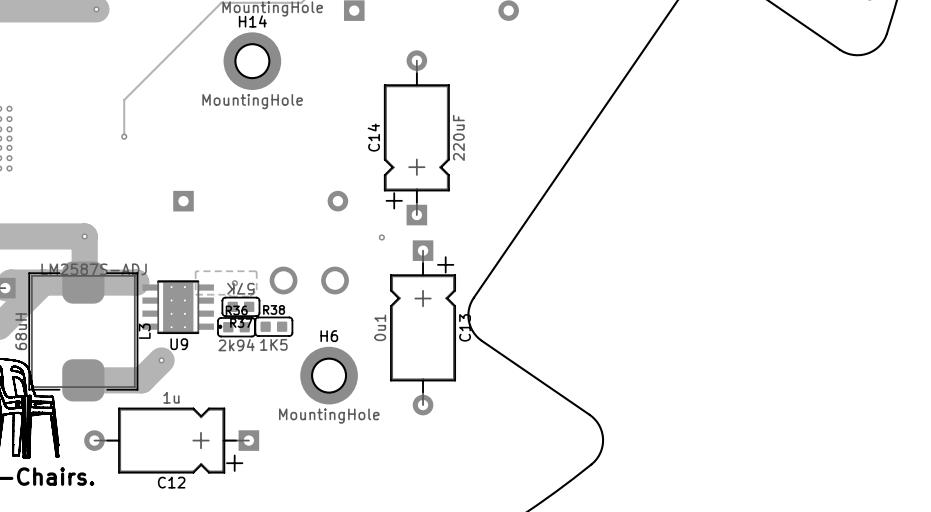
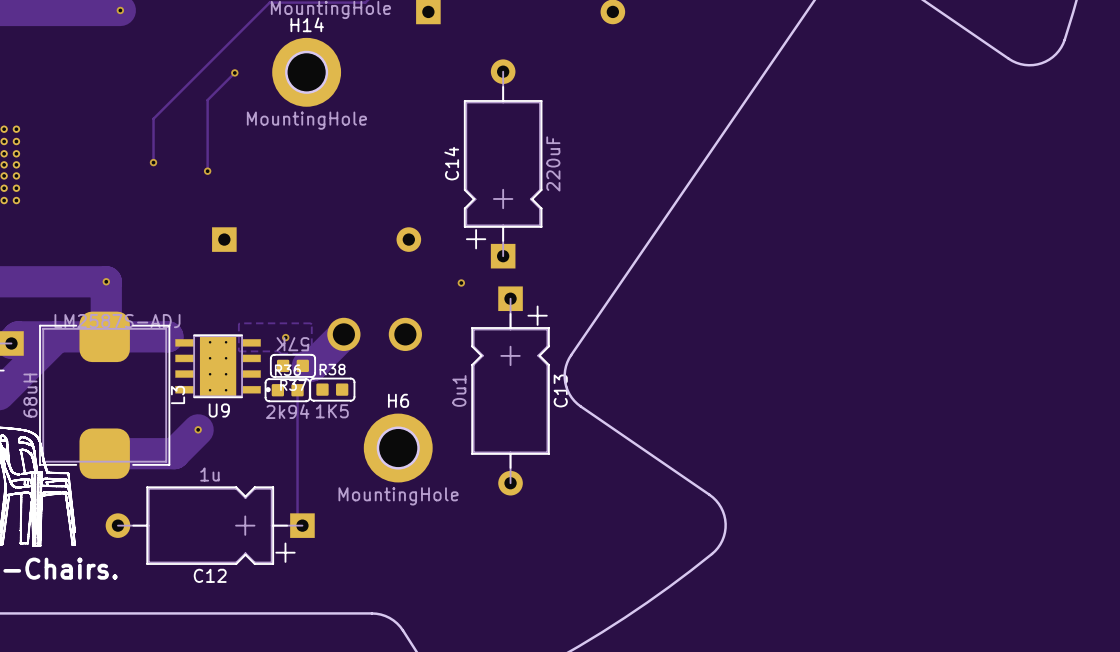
track: none -> (234, 72) (207, 100) (207, 171)
via: none -> (234, 72)
via: none -> (207, 171)
track: none -> (343, 334) (312, 365) (307, 365)
track: none -> (297, 390) (297, 520) (302, 525)

